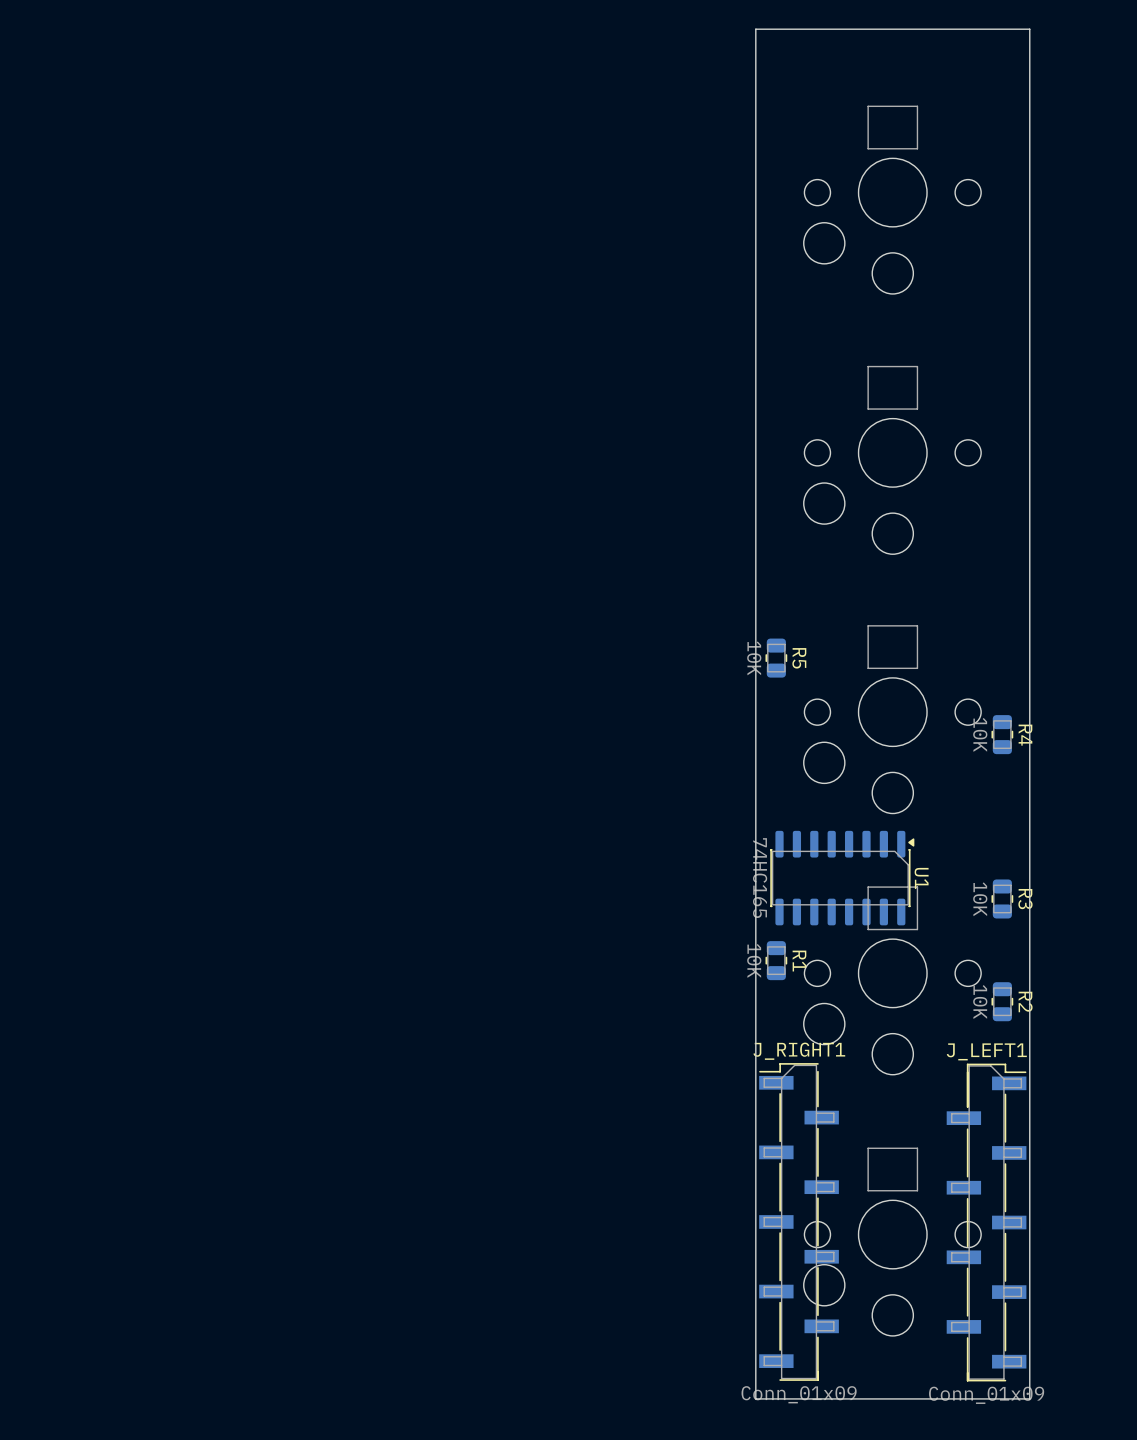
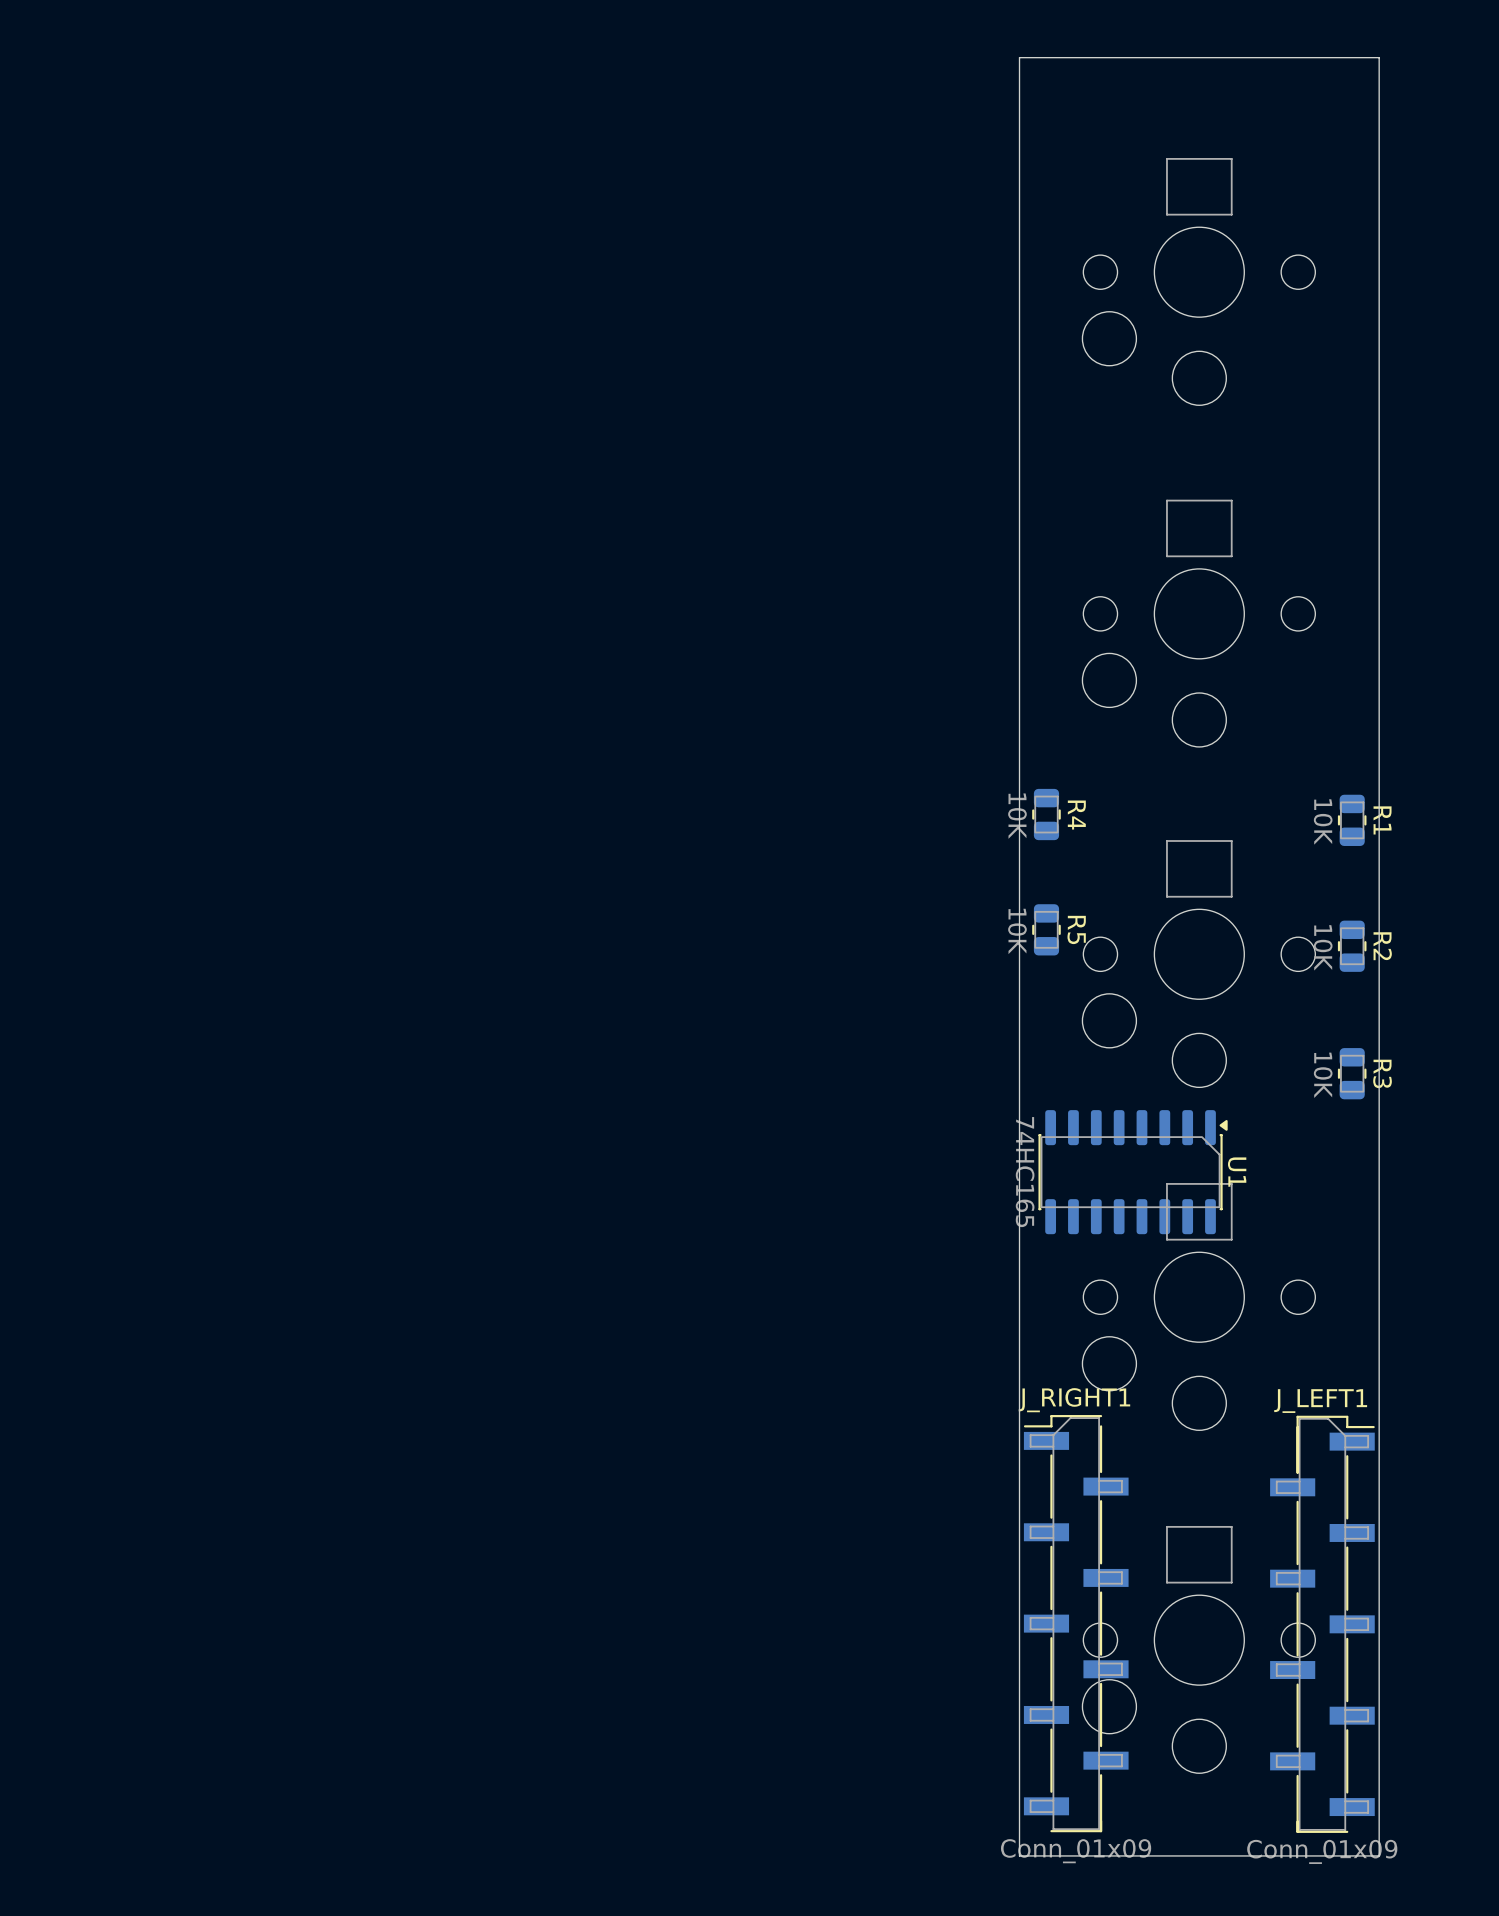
R5 position: (776, 658) -> (1046, 929)
R4 position: (1002, 734) -> (1046, 814)
R3 position: (1002, 898) -> (1352, 1073)
R1 position: (776, 960) -> (1352, 820)
R2 position: (1002, 1001) -> (1352, 946)

